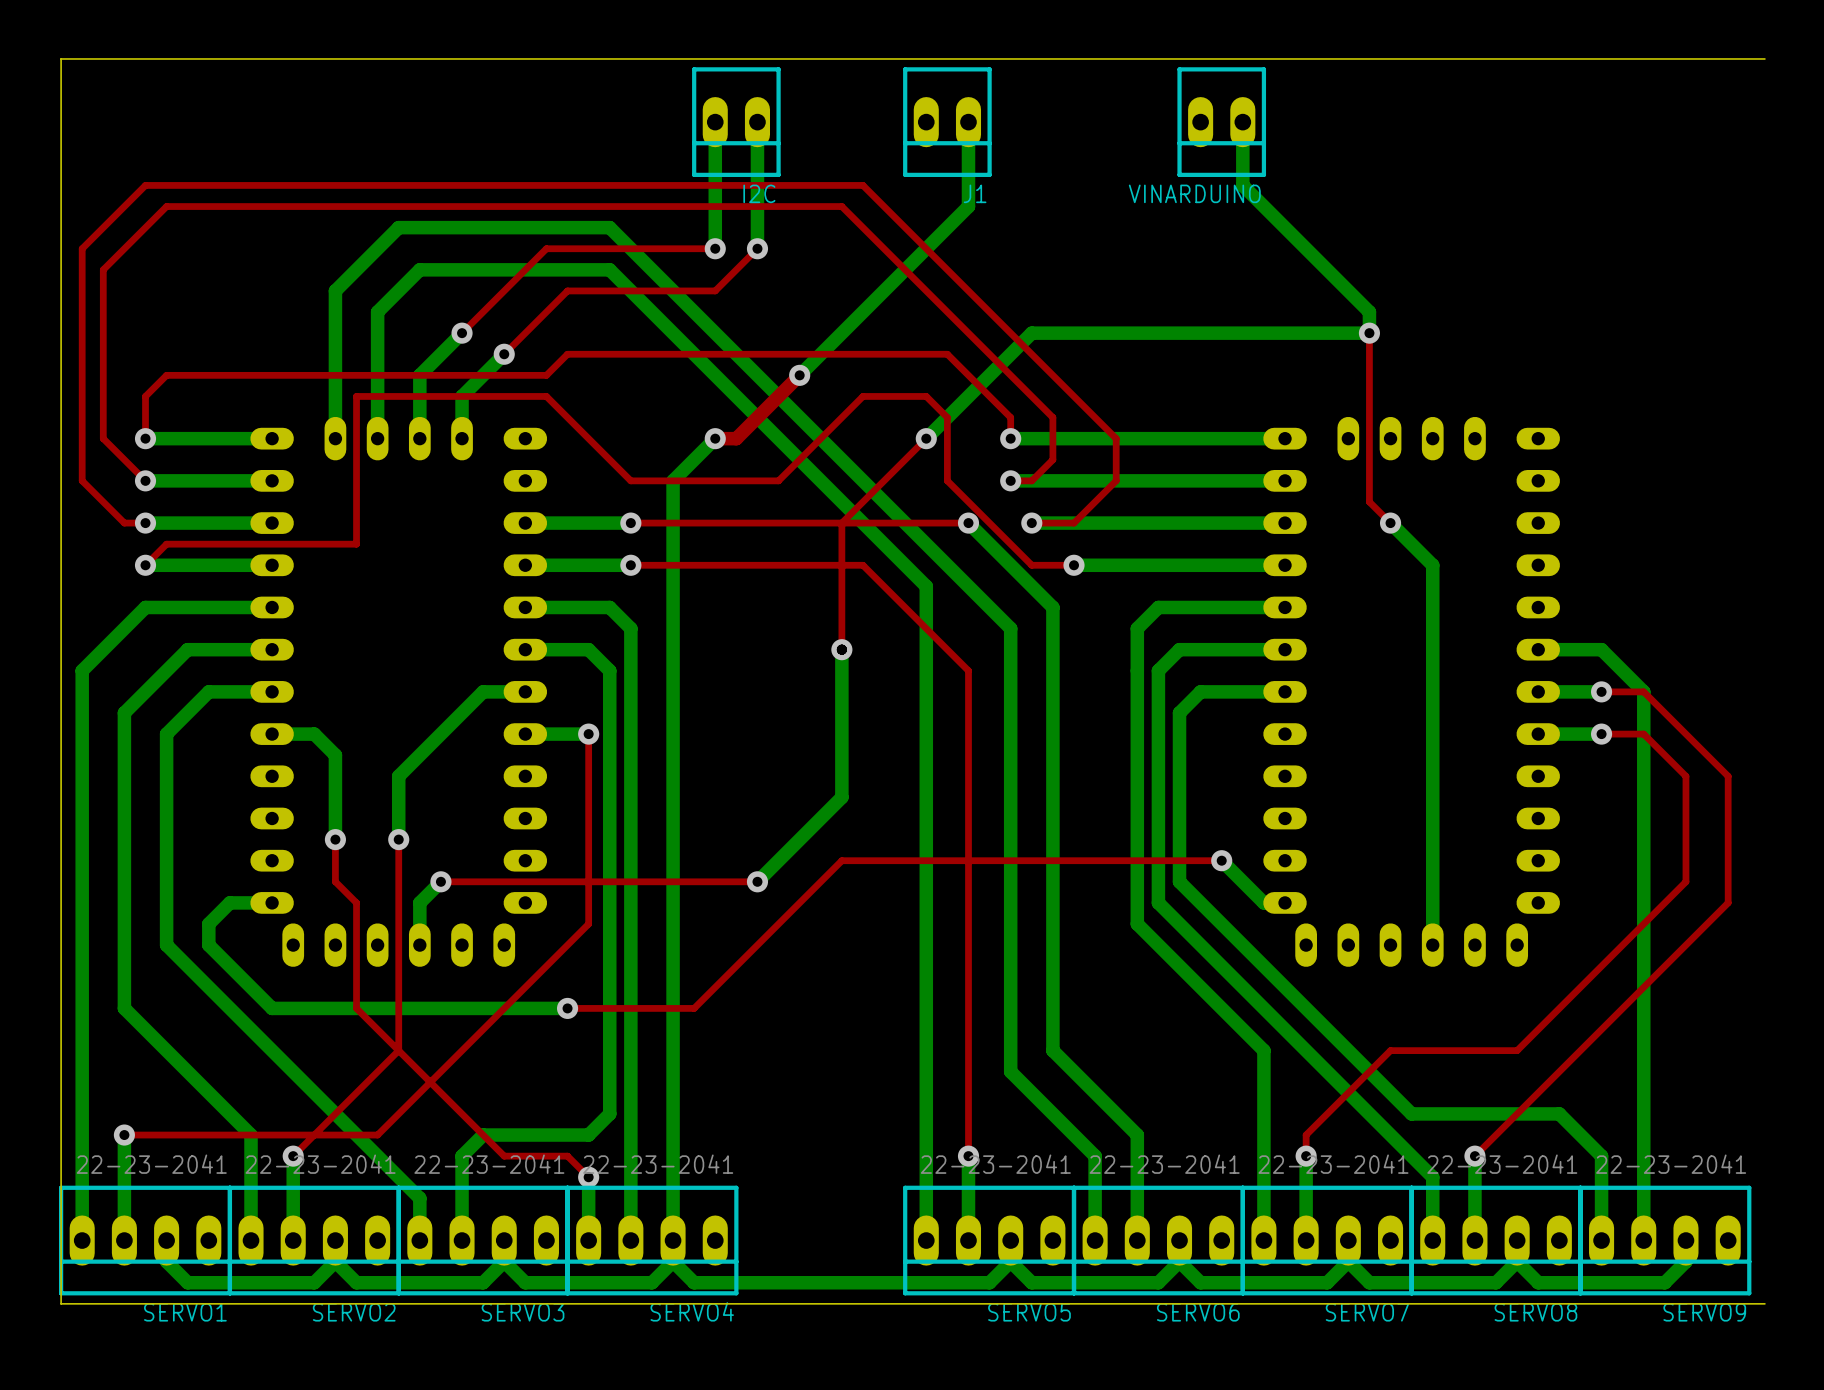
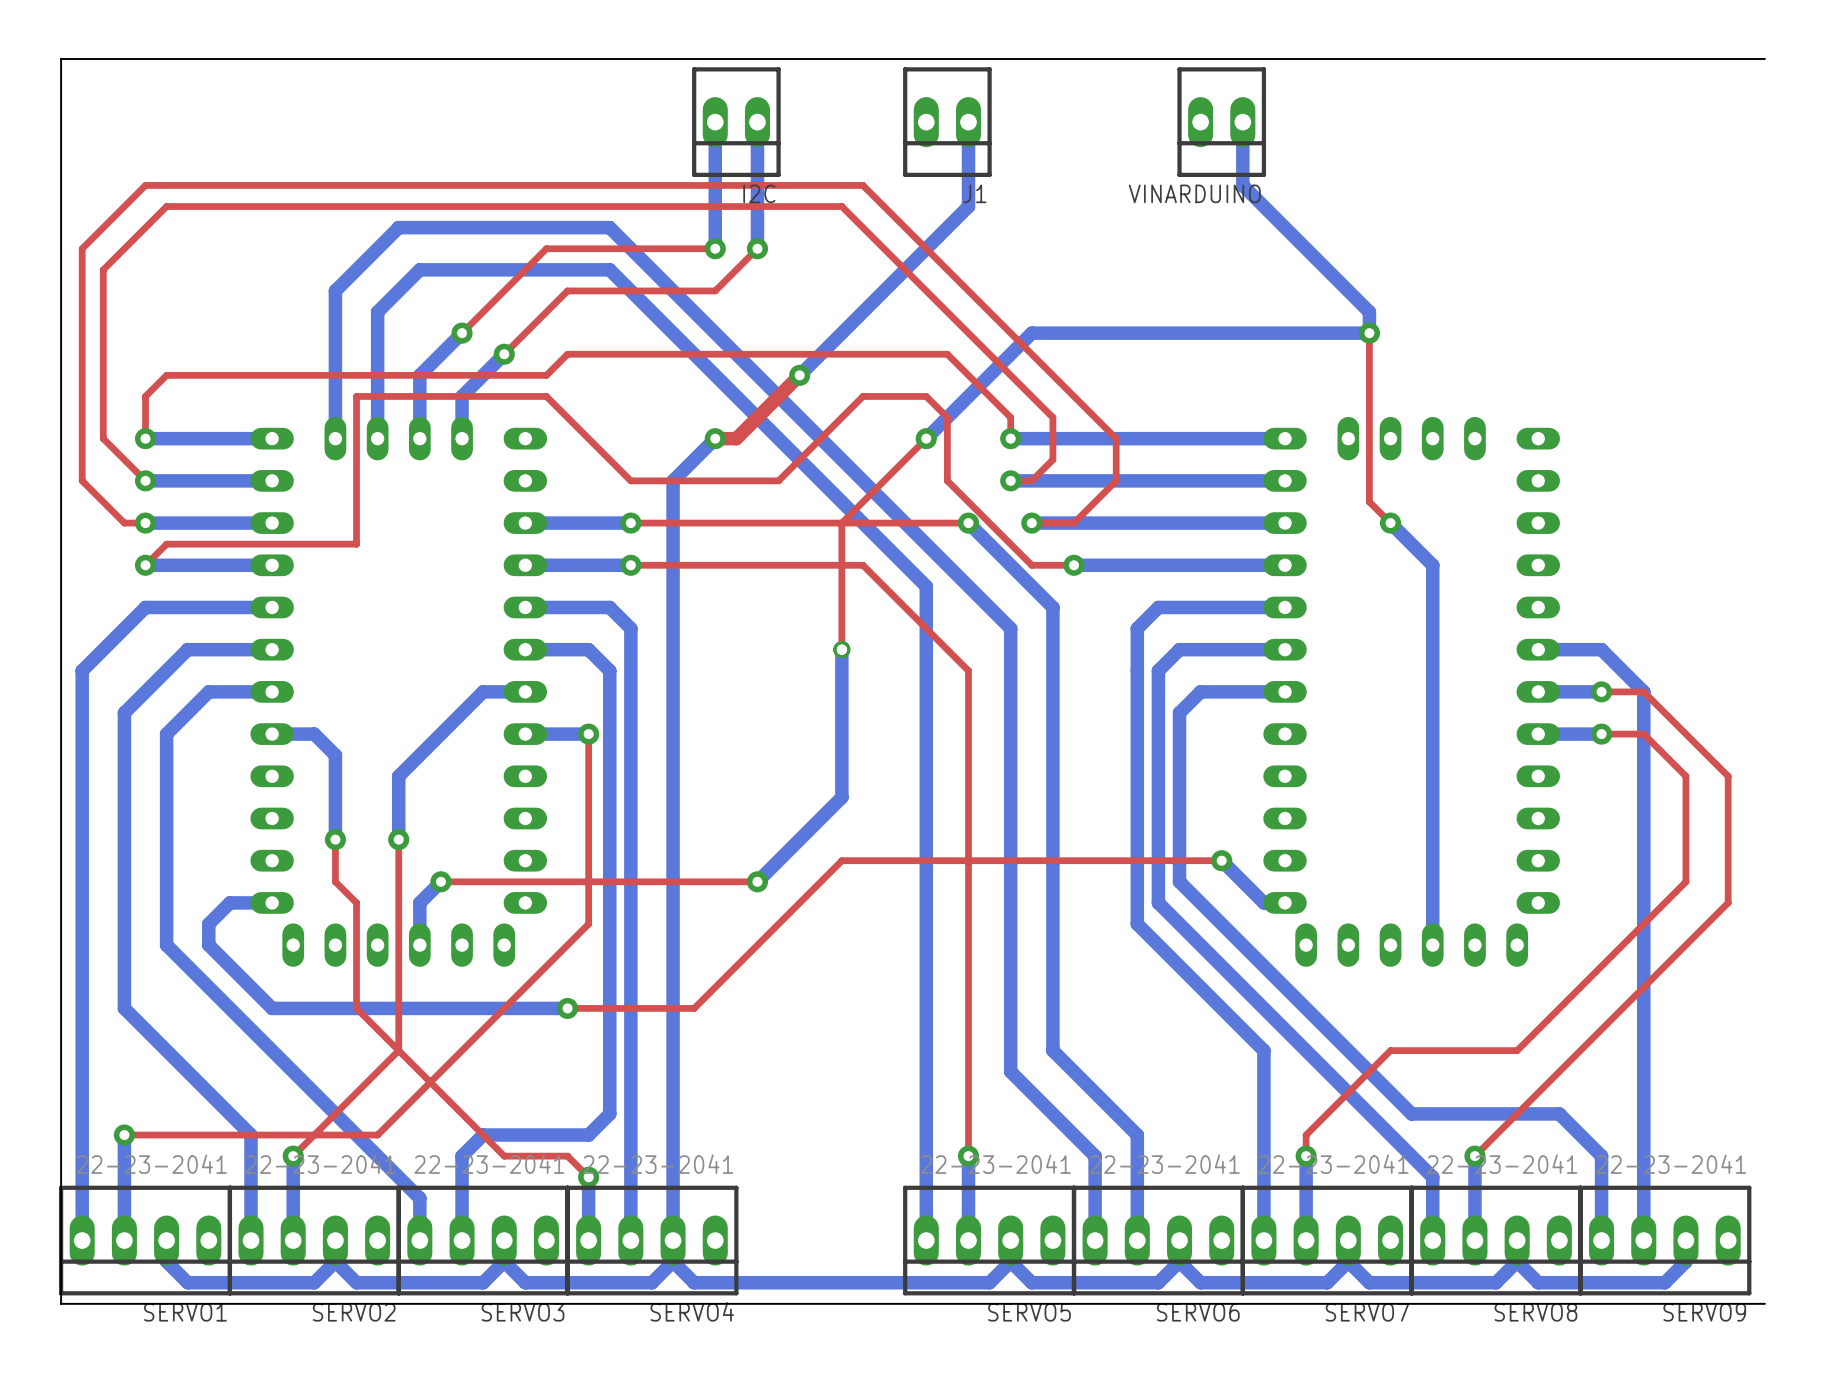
via: (841, 649) -> none

